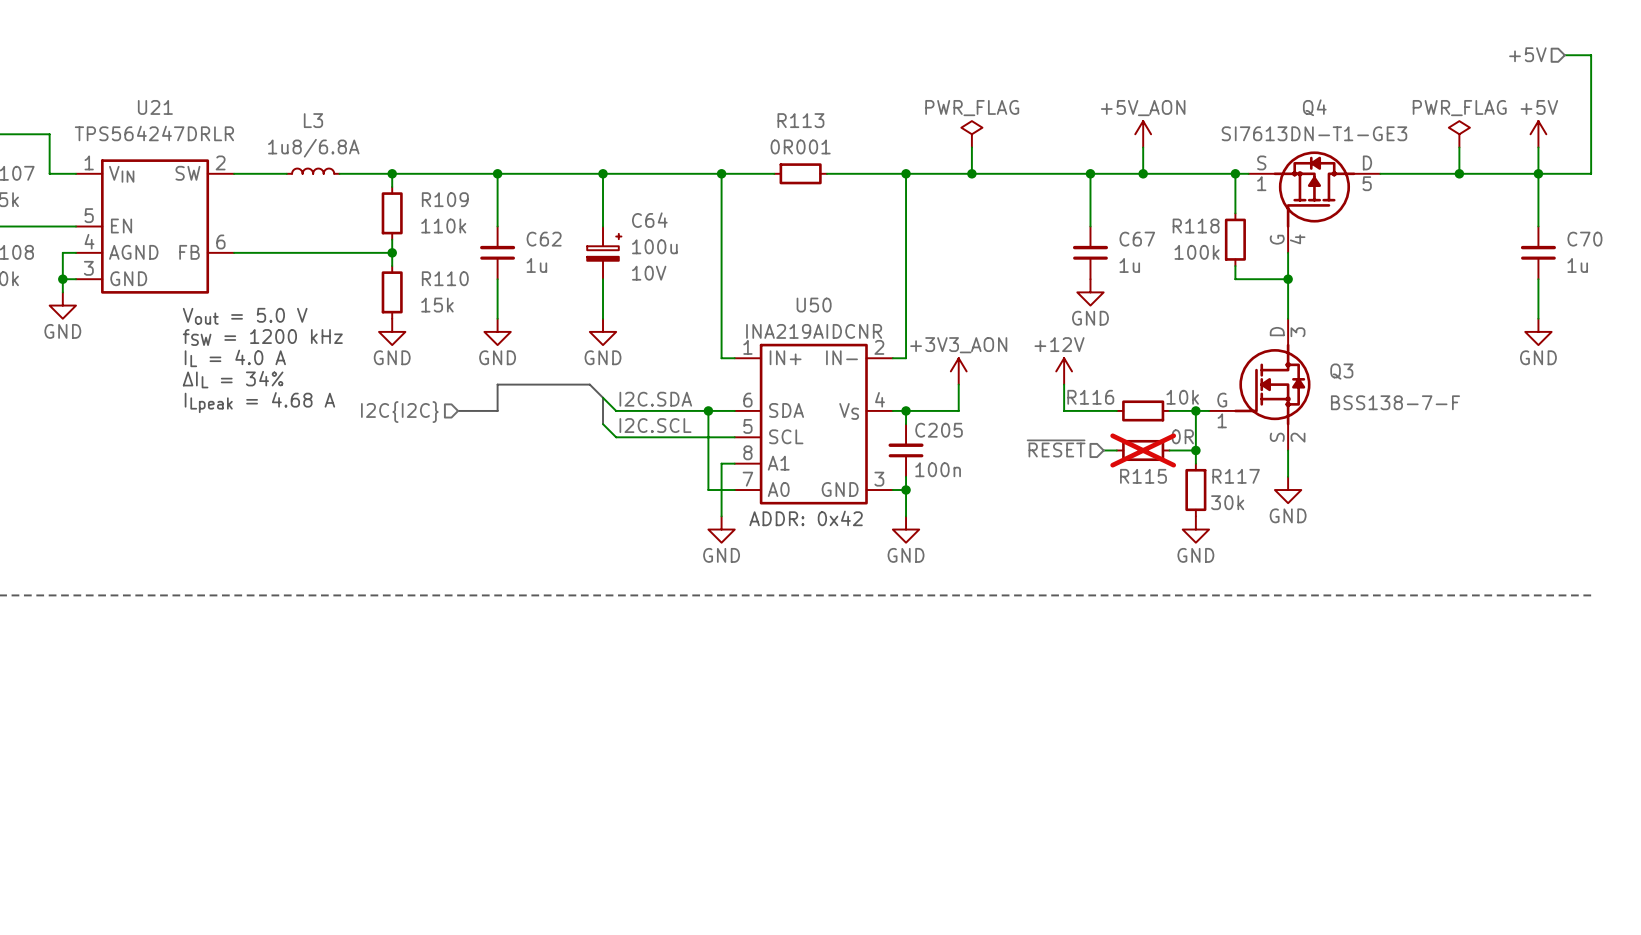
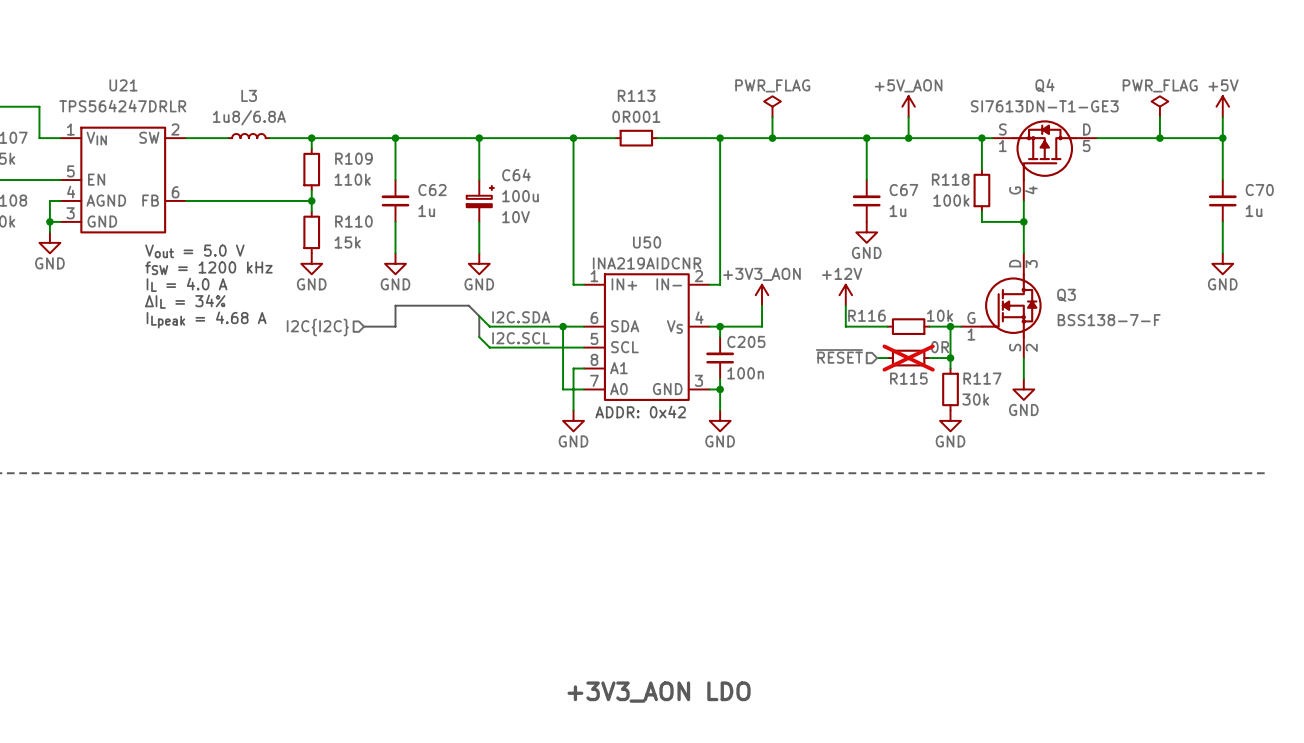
hierarchical label: +5V (1527, 54) -> none
wire: (1564, 55) (1591, 55) (1591, 173) (1538, 173) -> none
text: none -> +3V3_AON LDO (659, 692)

